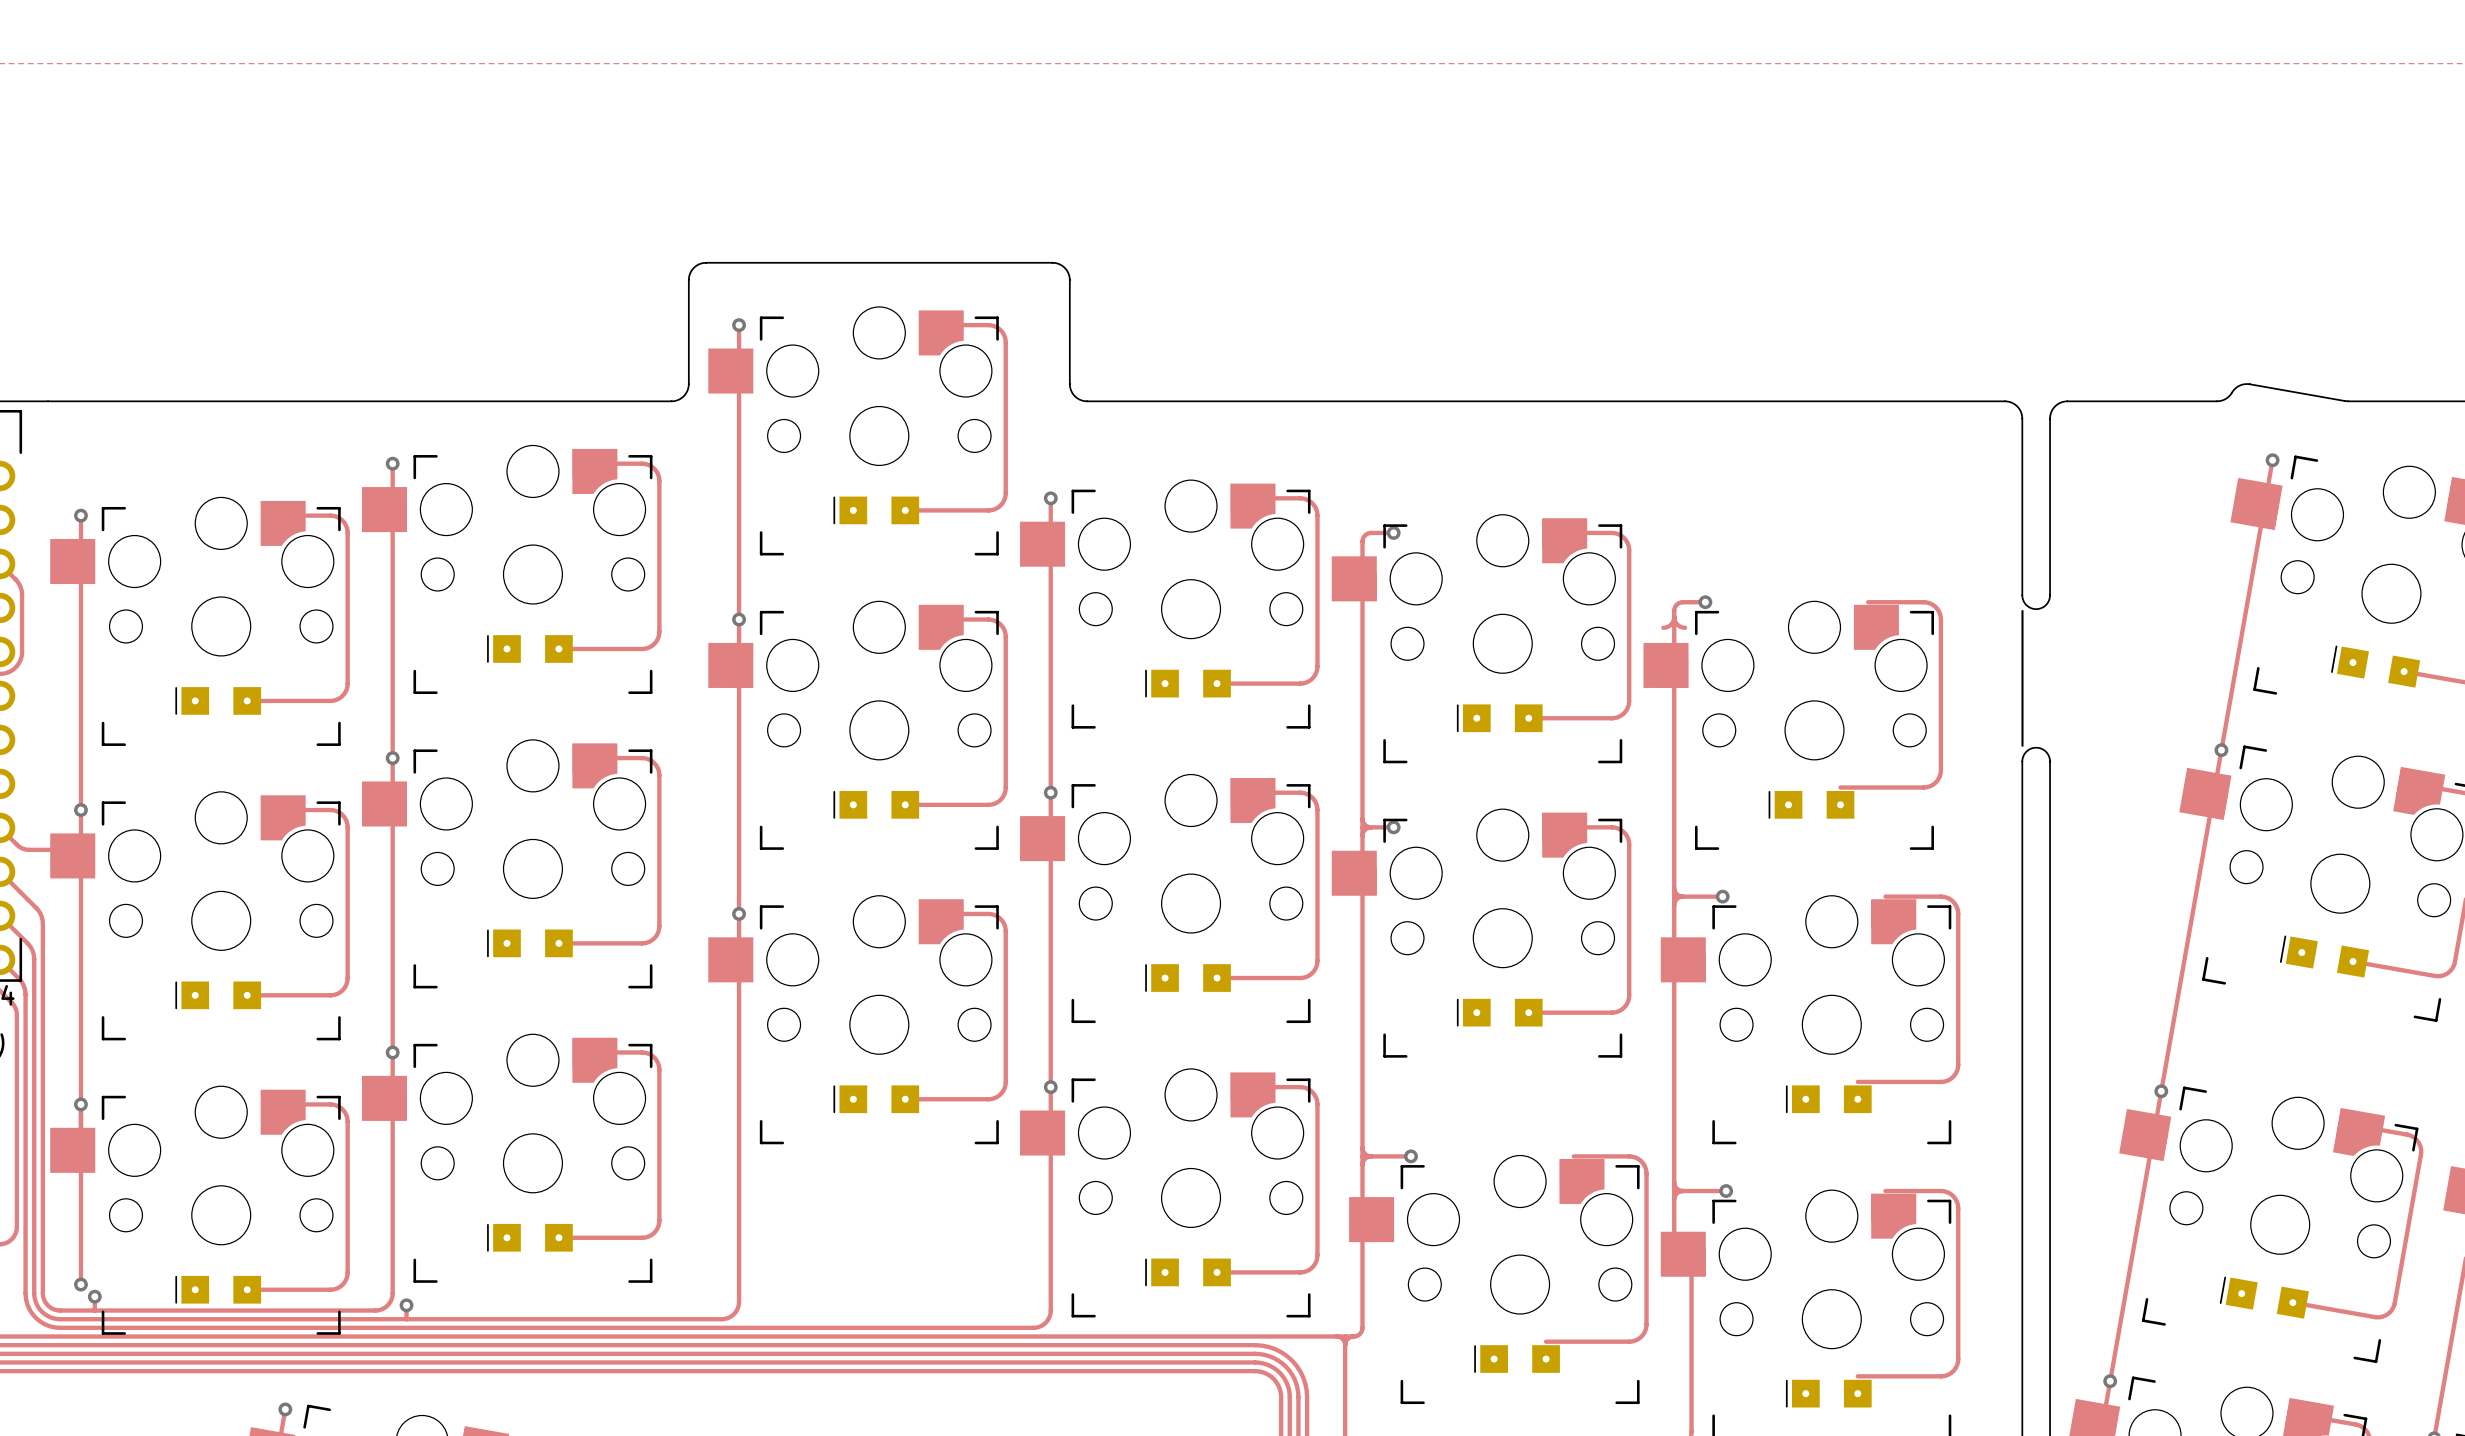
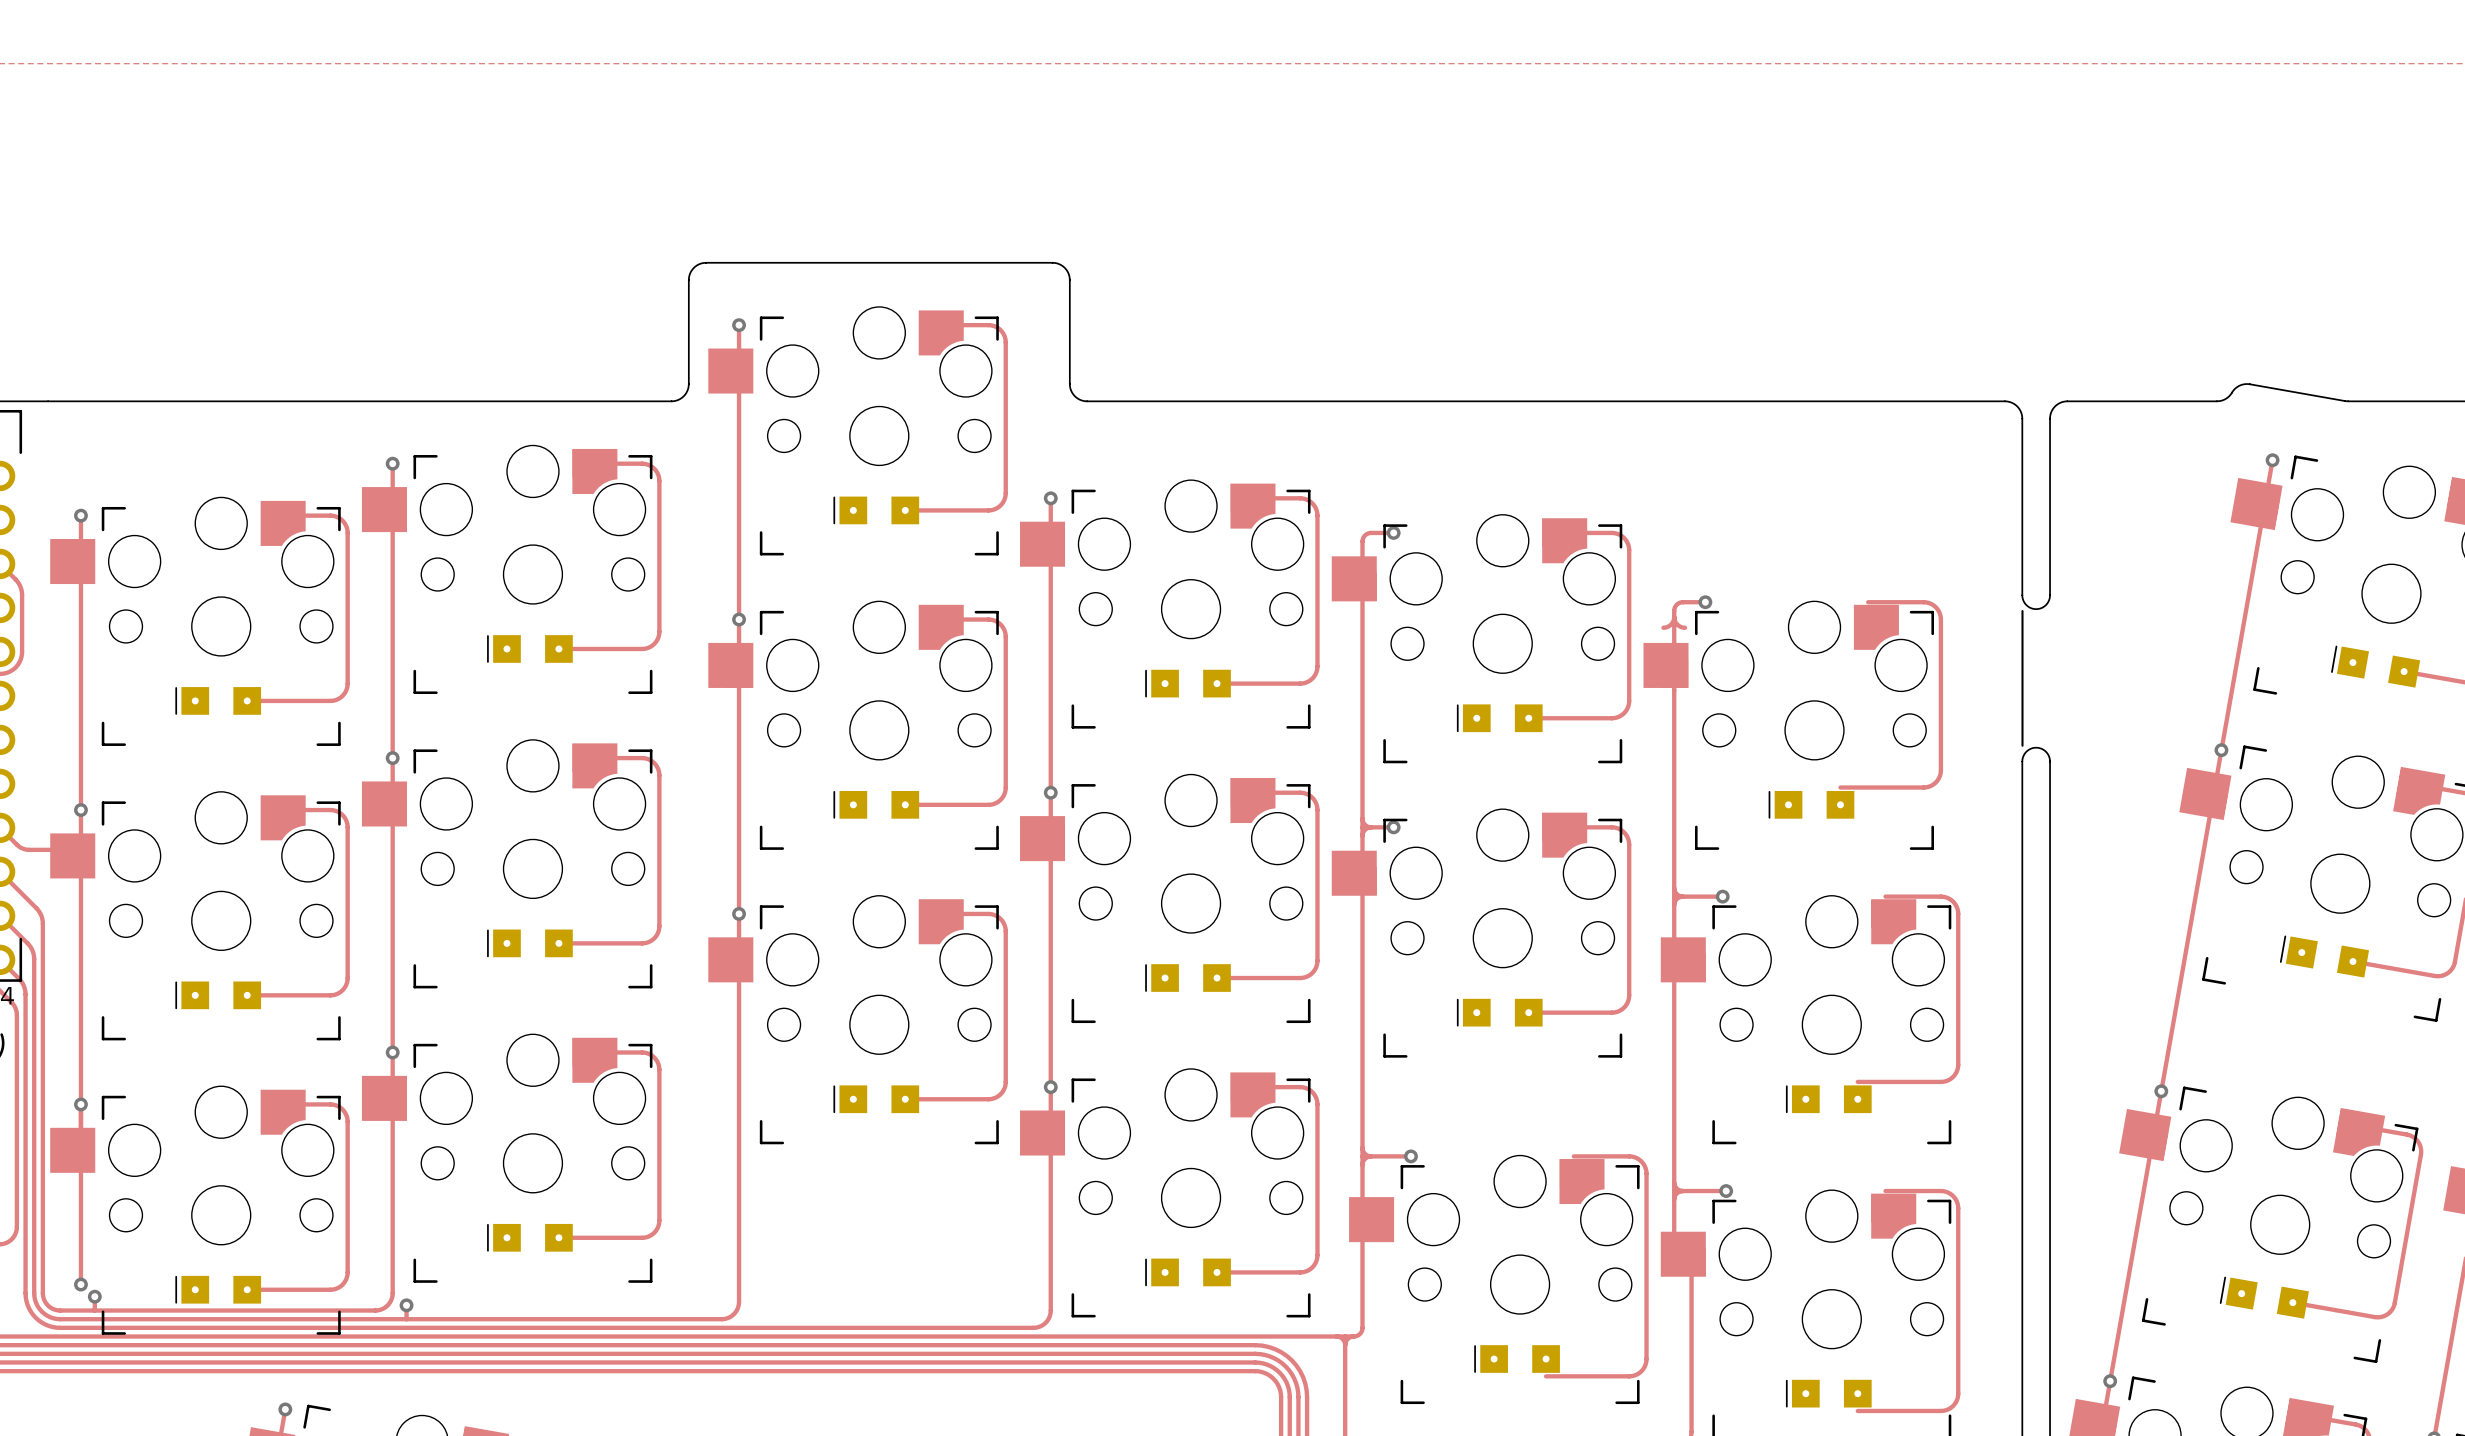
track: (1646, 1324) (1642, 1335) (1633, 1341) (1546, 1341) -> (1646, 1324) (1646, 1362) (1642, 1369) (1636, 1374) (1629, 1376) (1546, 1376)
track: (1958, 1359) (1954, 1369) (1944, 1375) (1857, 1376) -> (1958, 1359) (1957, 1397) (1954, 1404) (1948, 1409) (1940, 1410) (1857, 1410)

